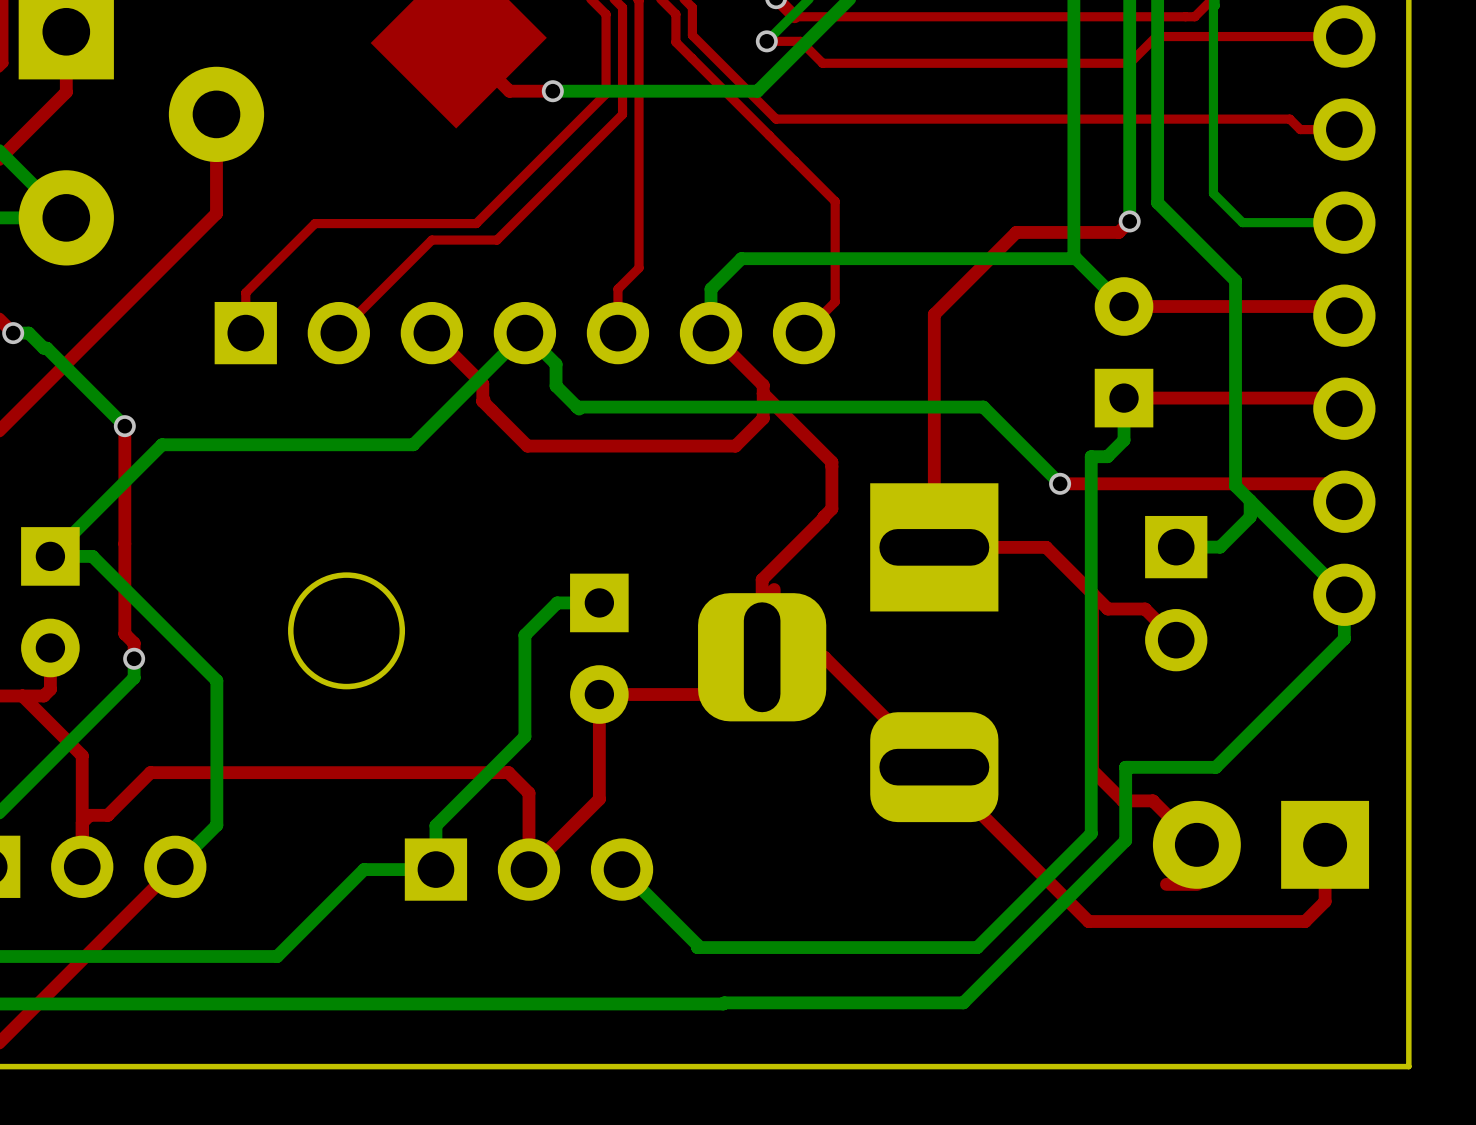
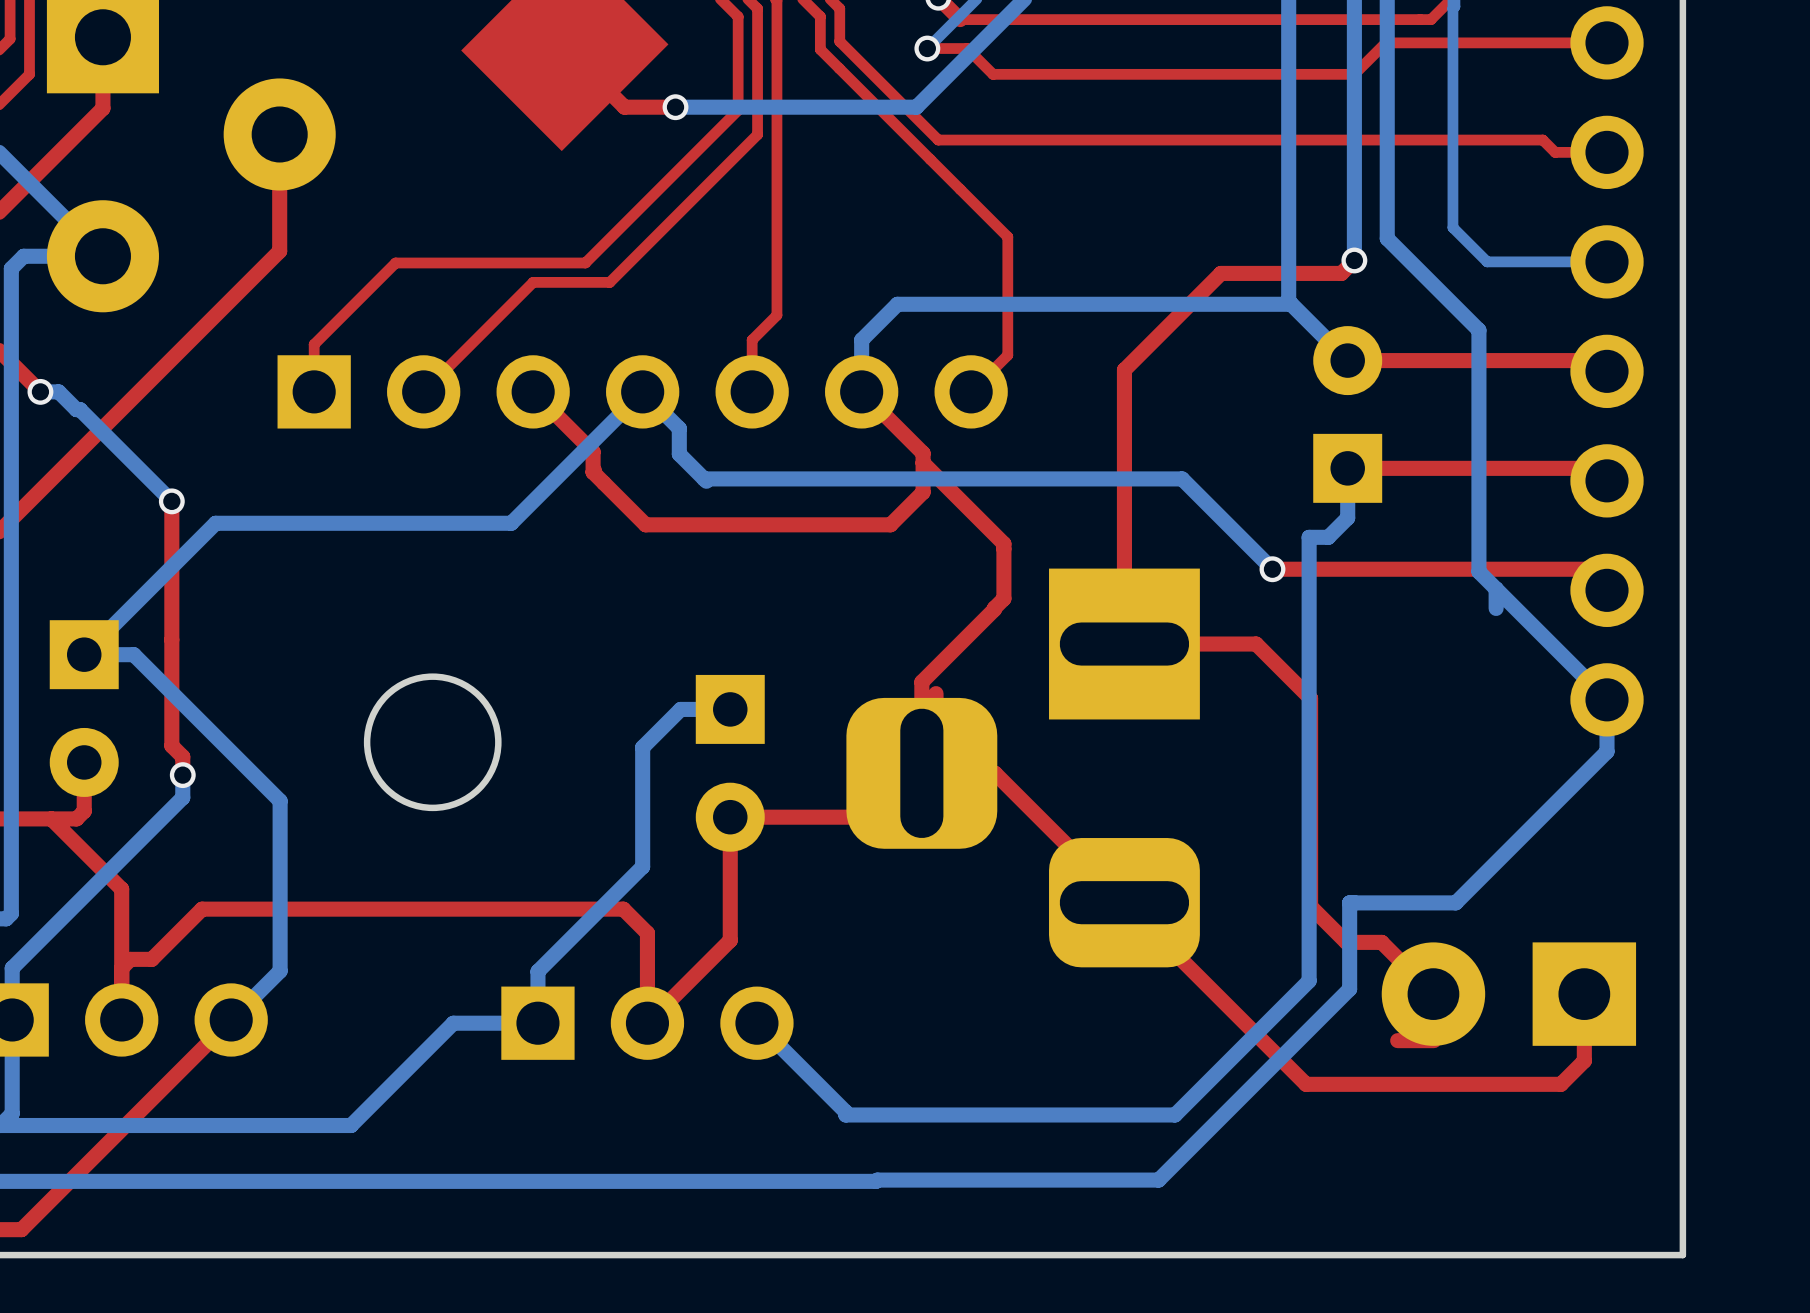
bottom track: (1250, 517) (1220, 547) (1176, 547) -> none
top track: (1092, 593) (1107, 609) (1145, 609) (1176, 640) -> none
part: (1176, 593) -> none

